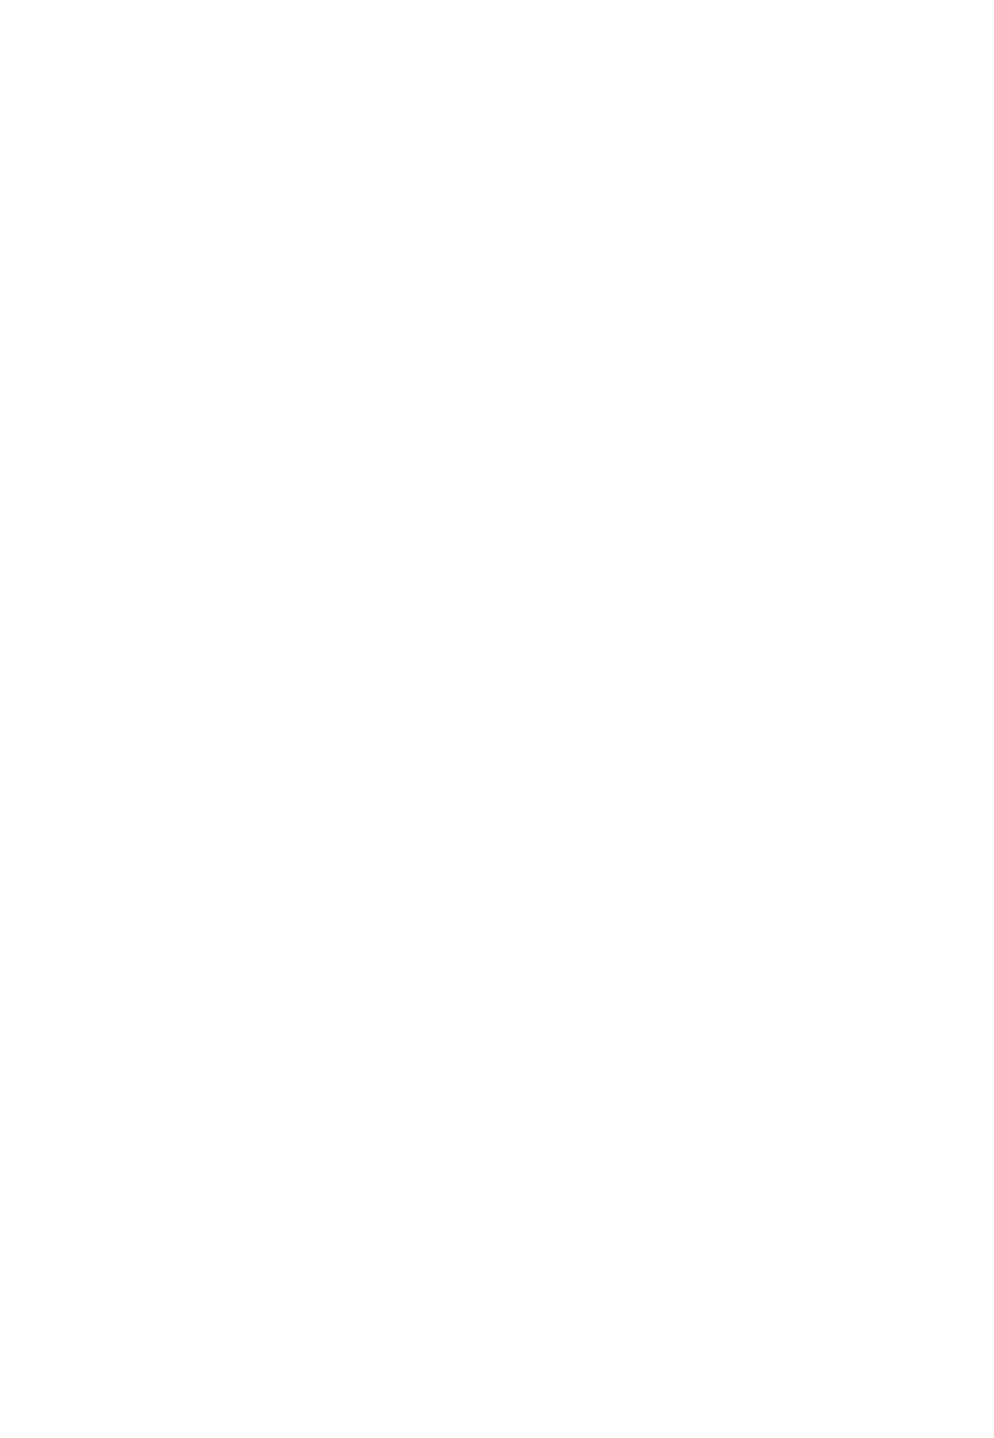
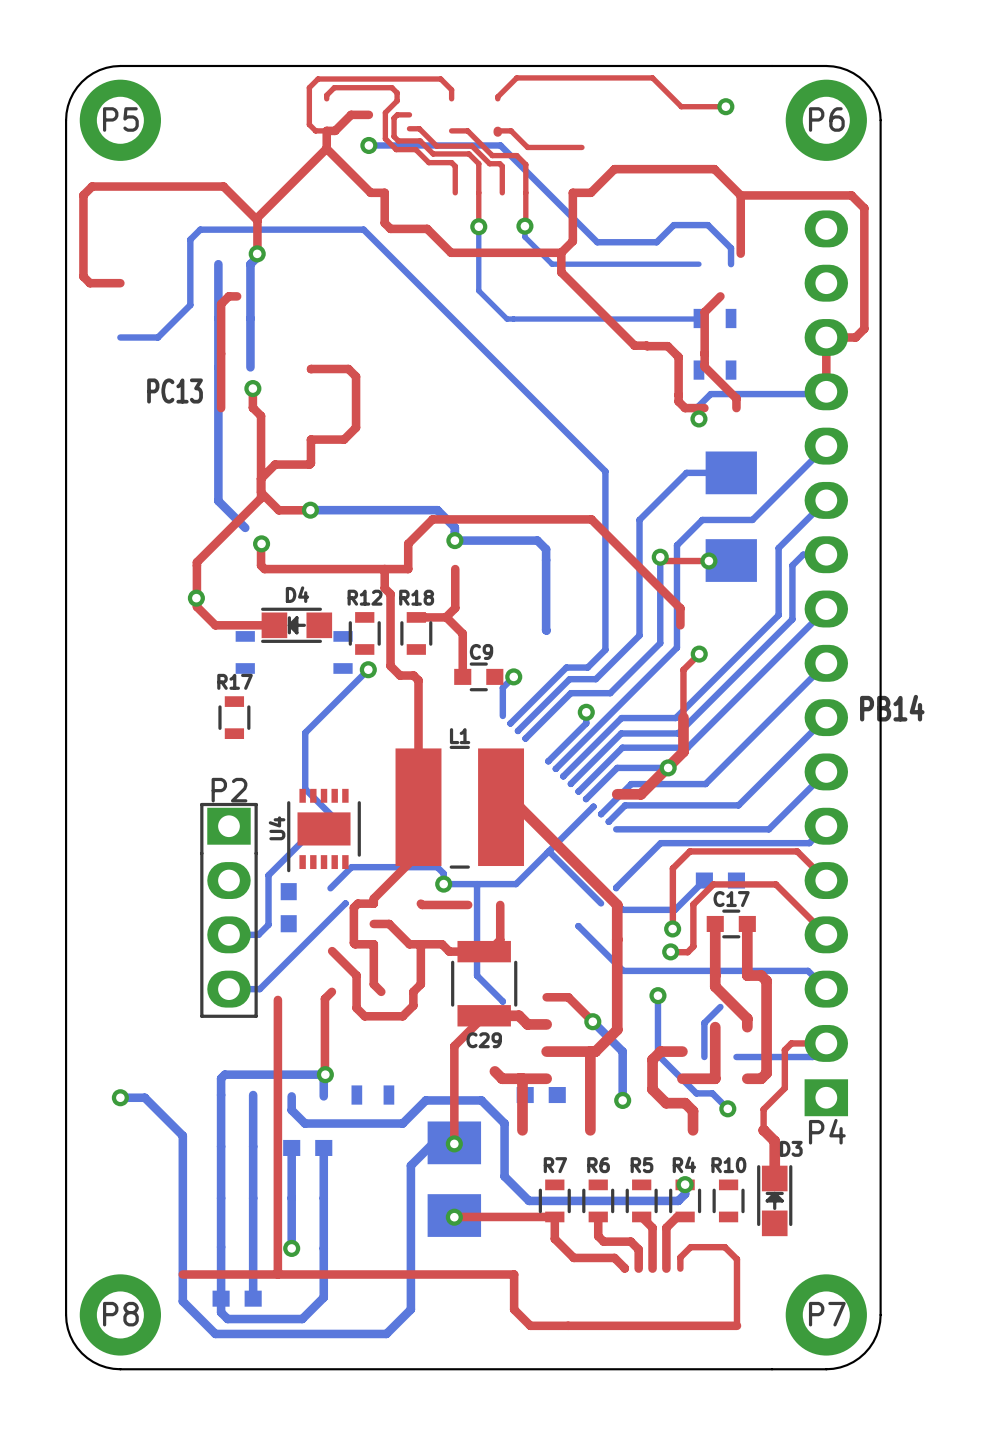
board edge: none -> (120, 65) (826, 65) (840, 67) (853, 73) (864, 81) (873, 93) (878, 106) (880, 120) (880, 1314) (878, 1329) (873, 1342) (864, 1353) (853, 1361) (840, 1367) (826, 1369) (120, 1369) (106, 1367) (93, 1361) (81, 1353) (73, 1342) (67, 1329) (66, 1314) (66, 120) (70, 99) (81, 81) (99, 70) (120, 65)
top track: none -> (326, 98) (326, 95) (334, 87) (391, 87) (397, 92) (397, 100) (385, 112) (385, 138) (396, 149) (415, 149) (428, 162) (451, 162) (455, 166) (455, 192)
top track: none -> (451, 98) (451, 89) (440, 79) (318, 79) (309, 87) (309, 124) (315, 130) (326, 130)
top track: none -> (497, 98) (516, 77) (652, 77) (681, 106) (725, 106)
via: none -> (725, 106)
top track: none -> (368, 114) (351, 114) (335, 130) (326, 130)
top track: none -> (409, 114) (397, 114) (394, 118) (394, 136) (398, 140) (420, 140) (433, 153) (469, 153) (478, 163) (478, 226)
P5: none -> (120, 120)
P6: none -> (826, 120)
top track: none -> (409, 128) (419, 128) (436, 146) (471, 146) (489, 163) (499, 163) (502, 166) (502, 192)
top track: none -> (326, 130) (326, 148) (370, 192) (384, 192) (384, 223) (390, 228) (427, 228) (451, 252) (561, 252)
top track: none -> (451, 130) (467, 130) (492, 155) (516, 155) (525, 164) (524, 226)
top track: none -> (497, 132) (497, 130) (511, 130) (527, 147) (581, 147)
bottom track: none -> (368, 145) (500, 145) (597, 242) (656, 242) (673, 225) (707, 225) (731, 248) (731, 264)
via: none -> (368, 145)
top track: none -> (326, 148) (257, 217) (257, 253)
top track: none -> (740, 195) (851, 195) (864, 208) (864, 328) (855, 337) (826, 337) (826, 391)
top track: none -> (740, 195) (740, 253)
top track: none -> (740, 195) (714, 169) (614, 169) (590, 192) (572, 192) (572, 241) (561, 252)
top track: none -> (257, 220) (223, 186) (92, 186) (83, 195) (83, 276) (89, 283) (120, 283)
bottom track: none -> (478, 226) (478, 290) (507, 319) (698, 318)
via: none -> (478, 226)
bottom track: none -> (524, 226) (524, 237) (552, 264) (698, 264)
via: none -> (524, 226)
top track: none -> (561, 252) (561, 272) (634, 345) (667, 346) (678, 357) (678, 401) (685, 408) (704, 408) (698, 413) (698, 418)
bottom track: none -> (257, 253) (257, 257) (250, 264) (250, 367)
via: none -> (257, 253)
bottom track: none -> (218, 264) (218, 501) (245, 527)
top track: none -> (237, 296) (228, 296) (221, 304) (221, 408)
top track: none -> (720, 296) (704, 312) (704, 353)
part: none -> (714, 318)
bottom track: none -> (120, 337) (157, 337) (190, 305) (190, 239) (200, 229) (363, 229) (605, 471) (605, 649) (587, 667) (566, 667) (510, 723)
top track: none -> (704, 354) (704, 366) (736, 398) (736, 408)
top track: none -> (311, 368) (348, 368) (356, 376) (356, 427) (344, 439) (311, 439)
part: none -> (714, 370)
top track: none -> (252, 388) (252, 407) (261, 415) (261, 498) (196, 562) (196, 606) (215, 625) (274, 625)
via: none -> (252, 388)
text: none -> PC13 (175, 391)
bottom track: none -> (826, 391) (824, 394) (710, 394) (698, 405) (698, 418)
via: none -> (698, 418)
top track: none -> (310, 439) (309, 464) (275, 464) (261, 478)
bottom track: none -> (826, 446) (752, 519) (702, 519) (676, 545) (676, 647) (555, 768)
bottom track: none -> (731, 472) (686, 472) (639, 519) (639, 635) (595, 679) (569, 679) (517, 730)
top track: none -> (261, 492) (278, 510) (310, 510)
bottom track: none -> (826, 500) (778, 548) (778, 615) (675, 718) (621, 718) (563, 776)
bottom track: none -> (310, 510) (437, 510) (454, 527) (454, 540) (537, 540) (546, 549) (546, 630)
via: none -> (310, 510)
part: none -> (731, 516)
via: none -> (454, 540)
top track: none -> (261, 543) (261, 565) (264, 569) (408, 569) (408, 543) (432, 519) (591, 519) (680, 608) (680, 625)
via: none -> (261, 543)
bottom track: none -> (826, 554) (803, 554) (792, 565) (792, 619) (678, 733) (621, 733) (570, 783)
bottom track: none -> (660, 557) (660, 643) (610, 693) (570, 693) (525, 738)
top track: none -> (660, 557) (664, 561) (708, 561)
via: none -> (660, 557)
via: none -> (708, 561)
top track: none -> (384, 569) (384, 588) (390, 594) (390, 666) (400, 675) (413, 675) (418, 680) (418, 853) (373, 898) (373, 903) (357, 903) (353, 907) (353, 942) (373, 944) (373, 984) (381, 991)
top track: none -> (455, 569) (455, 608) (446, 617)
via: none -> (196, 598)
bottom track: none -> (826, 609) (687, 747) (622, 747) (578, 791)
top track: none -> (416, 617) (446, 617) (462, 633) (462, 676)
D4: none -> (296, 625)
R12: none -> (364, 633)
R18: none -> (416, 633)
part: none -> (245, 652)
part: none -> (343, 652)
top track: none -> (699, 654) (683, 669) (683, 751) (641, 794) (617, 794)
via: none -> (699, 654)
bottom track: none -> (826, 663) (705, 784) (631, 784) (601, 814)
P4: none -> (826, 663)
bottom track: none -> (368, 669) (305, 732) (305, 789) (337, 821)
via: none -> (368, 669)
C9: none -> (478, 676)
bottom track: none -> (513, 676) (502, 687) (502, 715)
via: none -> (513, 676)
text: none -> PB14 (892, 708)
bottom track: none -> (586, 712) (586, 723) (548, 761)
via: none -> (586, 712)
R17: none -> (234, 717)
bottom track: none -> (826, 717) (738, 805) (625, 805) (608, 821)
bottom track: none -> (668, 767) (617, 767) (586, 799)
via: none -> (668, 767)
bottom track: none -> (826, 771) (768, 829) (616, 829)
bottom track: none -> (593, 806) (516, 884) (443, 884) (443, 873) (437, 867) (351, 867) (330, 888)
L1: none -> (459, 807)
top track: none -> (501, 807) (519, 807) (617, 904) (617, 1029) (595, 1051) (546, 1051)
bottom track: none -> (826, 826) (809, 843) (660, 843) (616, 888)
bottom track: none -> (330, 829) (314, 829) (268, 875) (268, 924) (258, 934) (228, 934)
U4: none -> (324, 830)
bottom track: none -> (548, 851) (601, 903)
bottom track: none -> (704, 880) (675, 909) (622, 909) (608, 895)
part: none -> (720, 880)
top track: none -> (826, 880) (797, 851) (689, 851) (672, 868) (672, 928)
via: none -> (443, 884)
bottom track: none -> (477, 884) (477, 975) (502, 1001)
bottom track: none -> (345, 903) (259, 989) (228, 989)
top track: none -> (420, 903) (468, 904)
top track: none -> (500, 904) (500, 940) (488, 951) (449, 951) (442, 944) (409, 944) (389, 923) (373, 923)
part: none -> (288, 907)
P2: none -> (228, 910)
top track: none -> (715, 923) (715, 986) (747, 1018) (747, 1027)
C17: none -> (731, 923)
top track: none -> (747, 923) (747, 975) (761, 975) (766, 980) (766, 1073) (761, 1078) (747, 1078)
bottom track: none -> (578, 926) (623, 970) (808, 970) (826, 989)
via: none -> (672, 928)
top track: none -> (826, 934) (775, 884) (713, 884) (693, 904) (693, 946) (687, 952) (670, 951)
top track: none -> (420, 944) (420, 984) (413, 991) (413, 1005) (402, 1016) (364, 1016) (356, 1008) (356, 975) (332, 951)
via: none -> (670, 951)
C29: none -> (484, 983)
top track: none -> (331, 991) (324, 998) (325, 1074)
bottom track: none -> (657, 995) (657, 1054) (696, 1093) (712, 1093) (727, 1108)
via: none -> (657, 995)
top track: none -> (546, 997) (568, 997) (592, 1021)
top track: none -> (277, 999) (277, 1274)
bottom track: none -> (720, 1006) (704, 1023) (704, 1057)
bottom track: none -> (592, 1021) (622, 1051) (622, 1100)
via: none -> (592, 1021)
top track: none -> (546, 1024) (527, 1024) (518, 1015) (484, 1015) (454, 1046) (454, 1143)
top track: none -> (715, 1027) (715, 1078) (682, 1078)
bottom track: none -> (826, 1043) (812, 1057) (736, 1057)
top track: none -> (826, 1043) (791, 1043) (784, 1050) (784, 1088) (763, 1109) (763, 1130)
top track: none -> (590, 1051) (590, 1130)
top track: none -> (682, 1051) (660, 1051) (652, 1059) (652, 1089) (666, 1103) (685, 1103) (693, 1111) (693, 1130)
top track: none -> (494, 1071) (502, 1078) (546, 1078)
via: none -> (325, 1074)
top track: none -> (522, 1078) (522, 1130)
bottom track: none -> (253, 1095) (253, 1298)
part: none -> (372, 1095)
part: none -> (541, 1095)
bottom track: none -> (291, 1096) (291, 1110) (305, 1123) (402, 1123) (425, 1100) (481, 1100) (504, 1123) (504, 1176) (529, 1200) (678, 1200) (685, 1194) (685, 1184)
bottom track: none -> (323, 1096) (325, 1074) (224, 1074) (221, 1078) (221, 1312) (227, 1319) (302, 1319) (323, 1297) (323, 1147)
bottom track: none -> (120, 1097) (144, 1097) (182, 1135) (182, 1301) (215, 1333) (386, 1333) (410, 1309) (410, 1165) (433, 1142) (454, 1143)
via: none -> (120, 1097)
via: none -> (622, 1100)
via: none -> (727, 1108)
top track: none -> (763, 1130) (774, 1141) (774, 1178)
via: none -> (454, 1143)
bottom track: none -> (290, 1146) (291, 1248)
part: none -> (307, 1147)
part: none -> (454, 1179)
via: none -> (685, 1184)
R7: none -> (554, 1200)
R6: none -> (598, 1200)
R5: none -> (641, 1200)
R4: none -> (685, 1200)
R10: none -> (728, 1200)
D3: none -> (774, 1200)
top track: none -> (454, 1216) (554, 1216) (554, 1238) (573, 1257) (614, 1257) (624, 1268)
top track: none -> (598, 1216) (598, 1236) (603, 1241) (630, 1241) (638, 1249) (638, 1268)
top track: none -> (641, 1216) (652, 1227) (652, 1268)
top track: none -> (685, 1216) (677, 1216) (666, 1227) (666, 1268)
via: none -> (454, 1217)
via: none -> (291, 1248)
top track: none -> (680, 1268) (680, 1257) (690, 1247) (724, 1247) (736, 1259) (736, 1325) (530, 1325) (514, 1309) (514, 1274) (182, 1274)
part: none -> (237, 1298)
P8: none -> (120, 1314)
P7: none -> (826, 1314)

